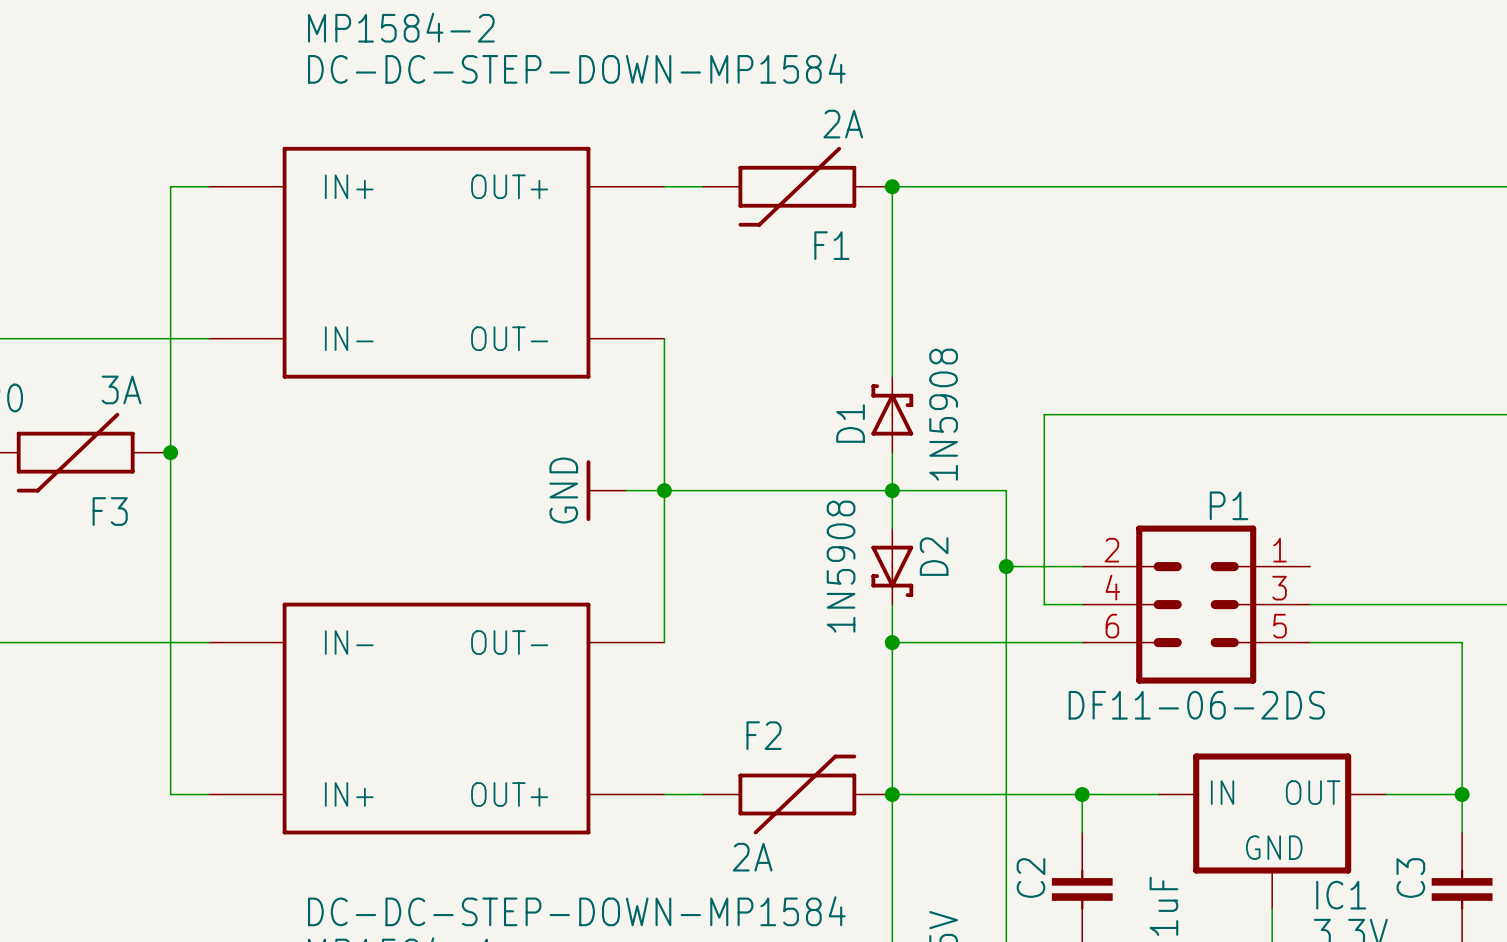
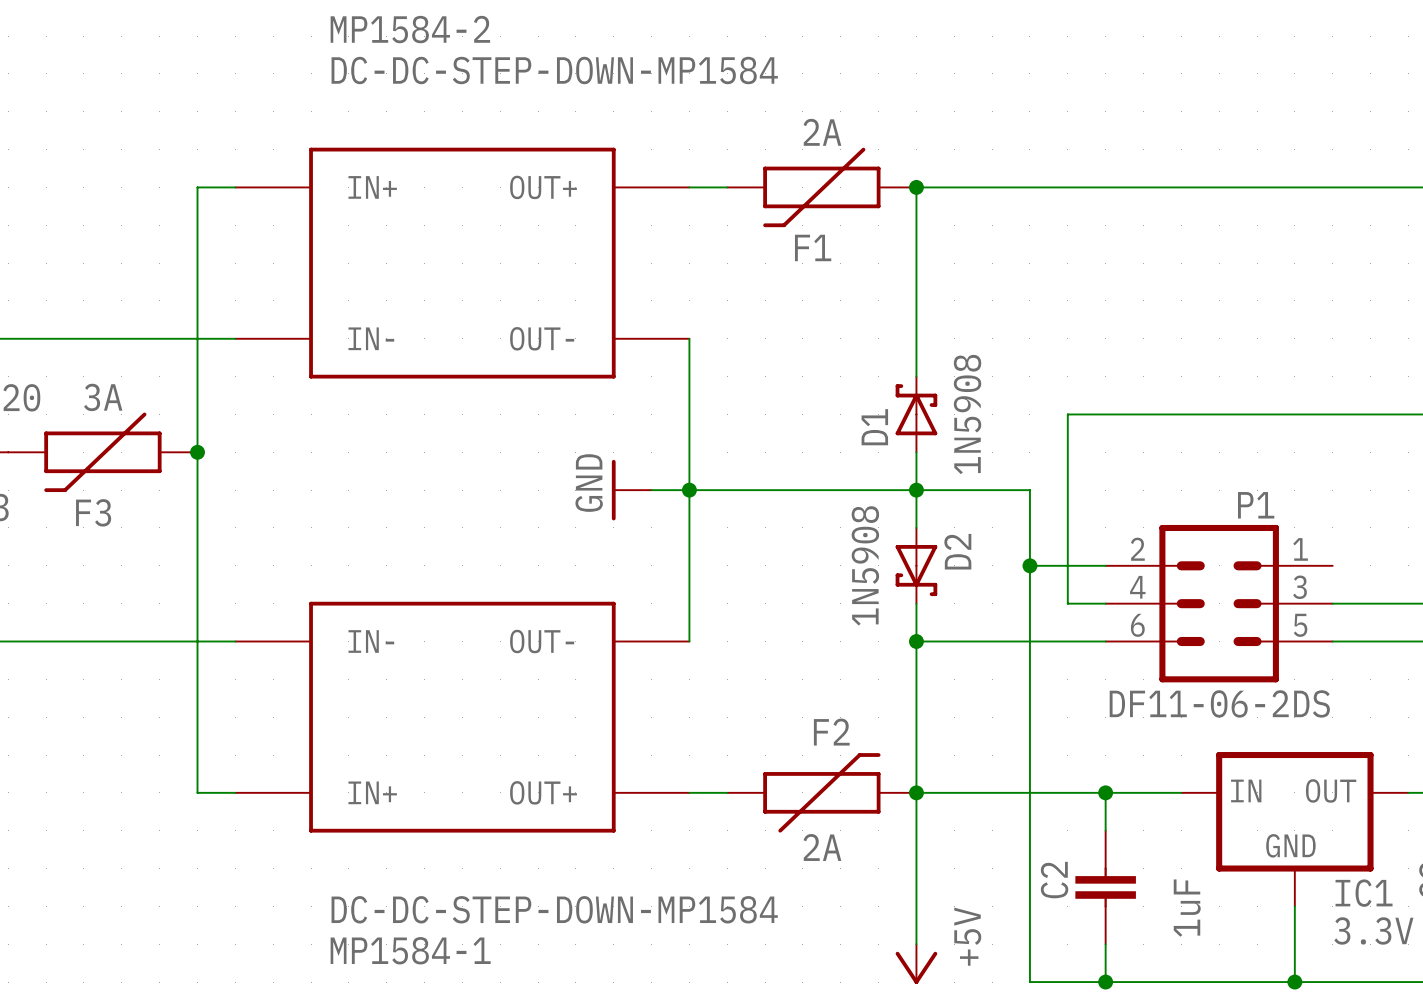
F1 value position: 2A (843, 124) -> 2A (822, 132)
F1 name position: F1 (831, 245) -> F1 (813, 247)
F3 value position: 3A (121, 389) -> 3A (103, 397)
F3 name position: F3 (110, 511) -> F3 (93, 512)
F2 name position: F2 (764, 735) -> F2 (831, 732)
F2 value position: 2A (752, 857) -> 2A (822, 847)

